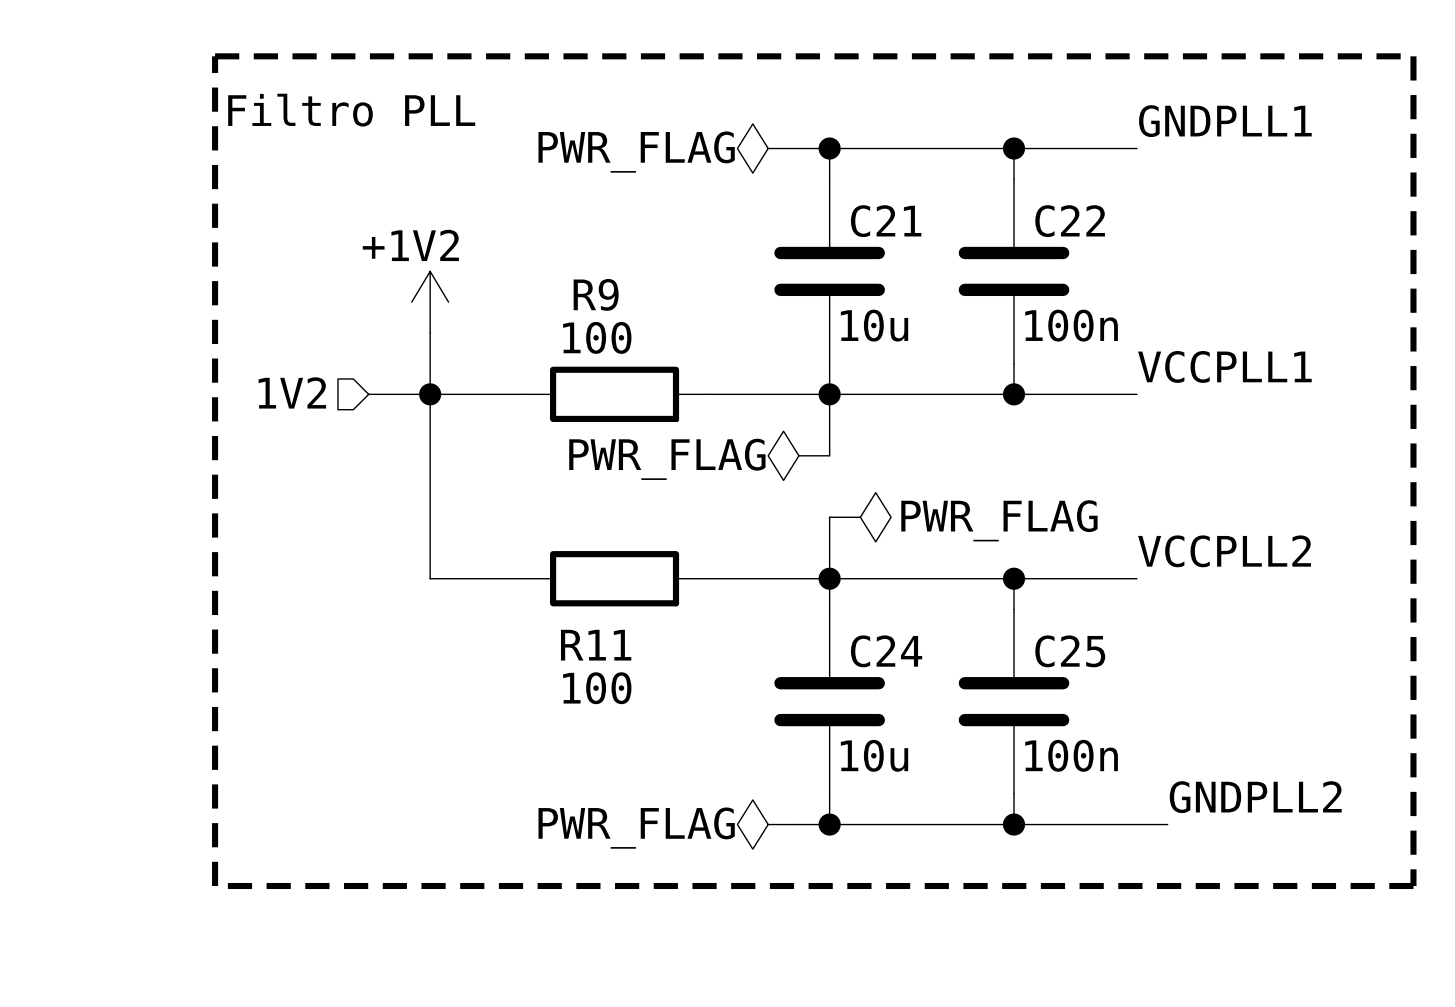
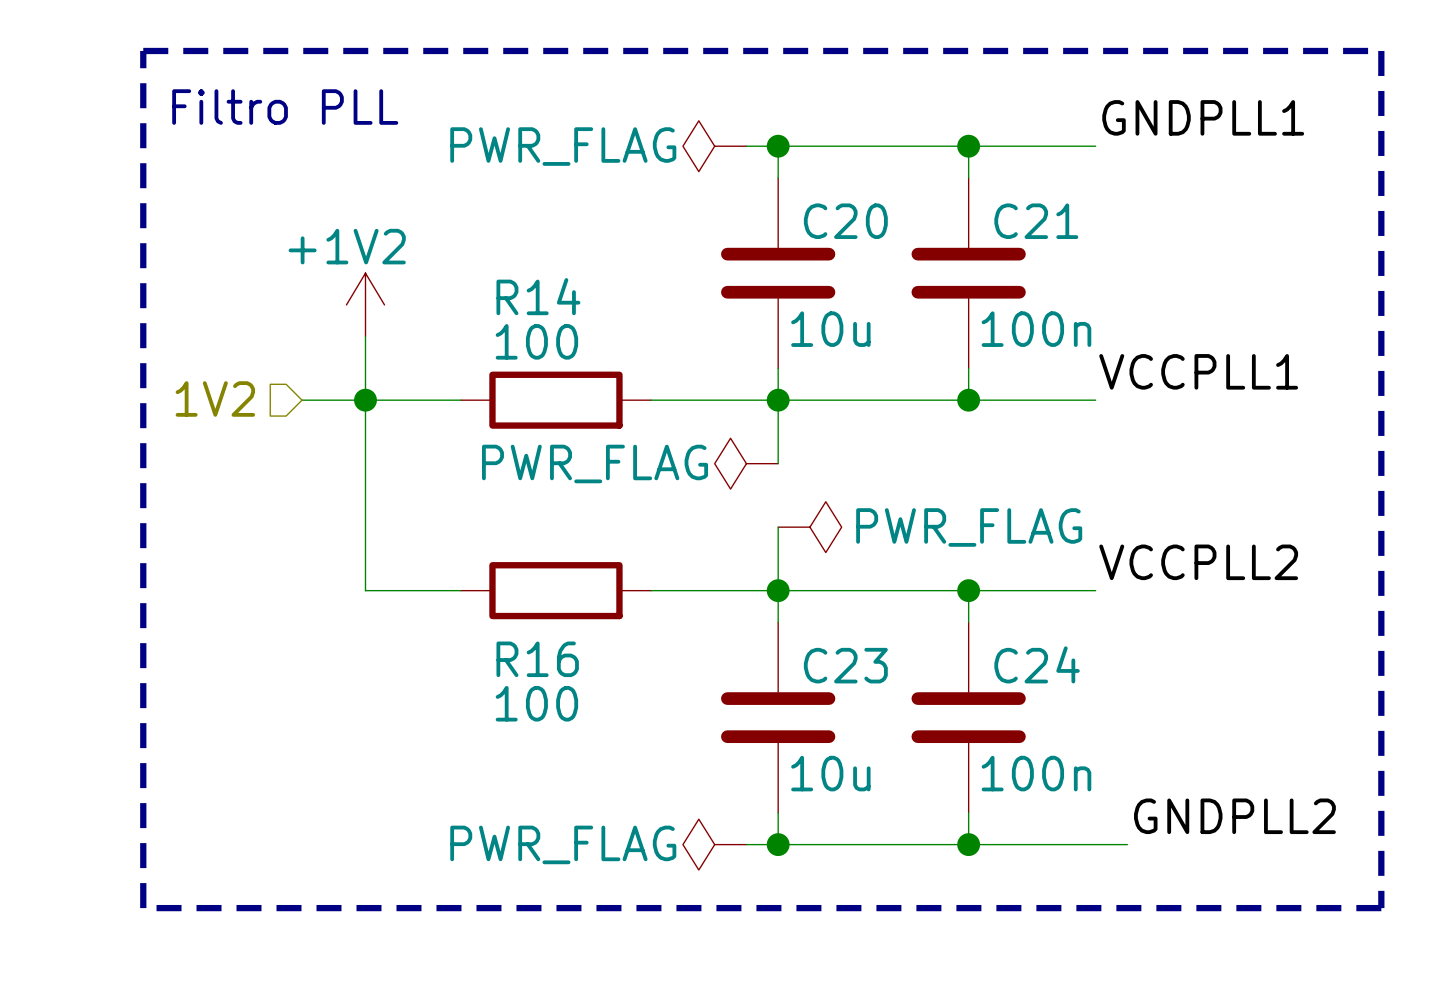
C21 name: C21 (886, 221) -> C20 (845, 221)
C22 name: C22 (1070, 221) -> C21 (1036, 221)
R9 name: R9 (596, 294) -> R14 (538, 296)
R11 name: R11 (596, 645) -> R16 (537, 659)
C24 name: C24 (886, 651) -> C23 (845, 665)
C25 name: C25 (1070, 651) -> C24 (1037, 664)

